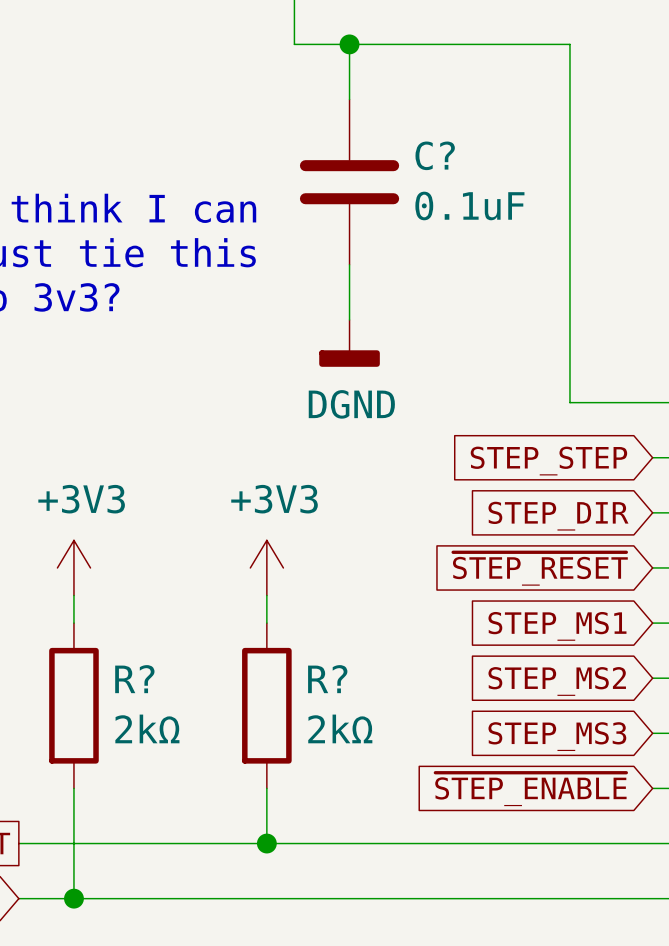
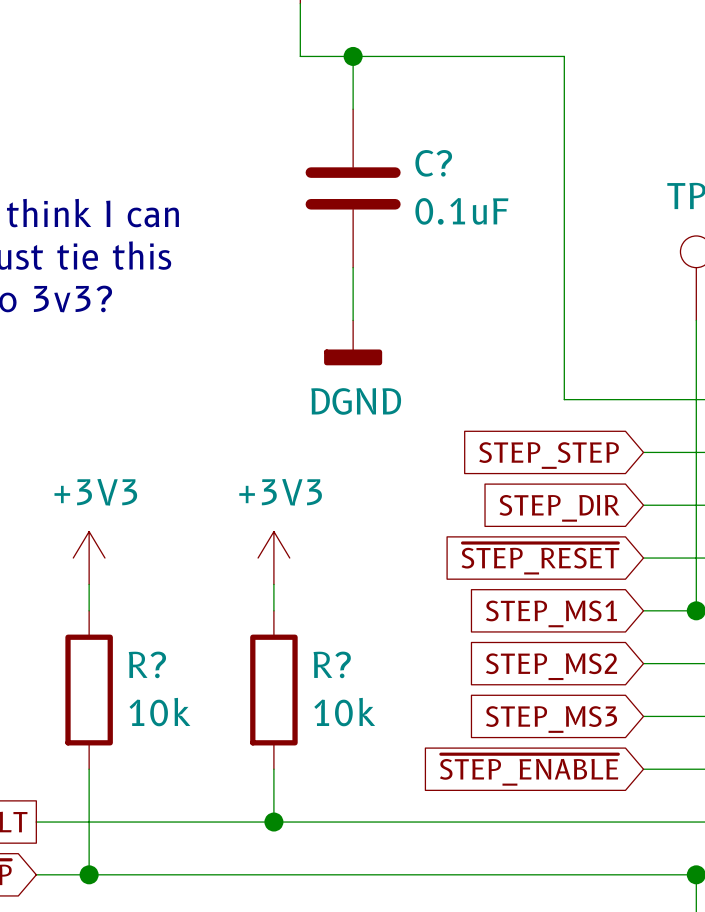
R? value: 2kΩ (147, 728) -> 10k (159, 712)
R? value: 2kΩ (340, 728) -> 10k (344, 712)

